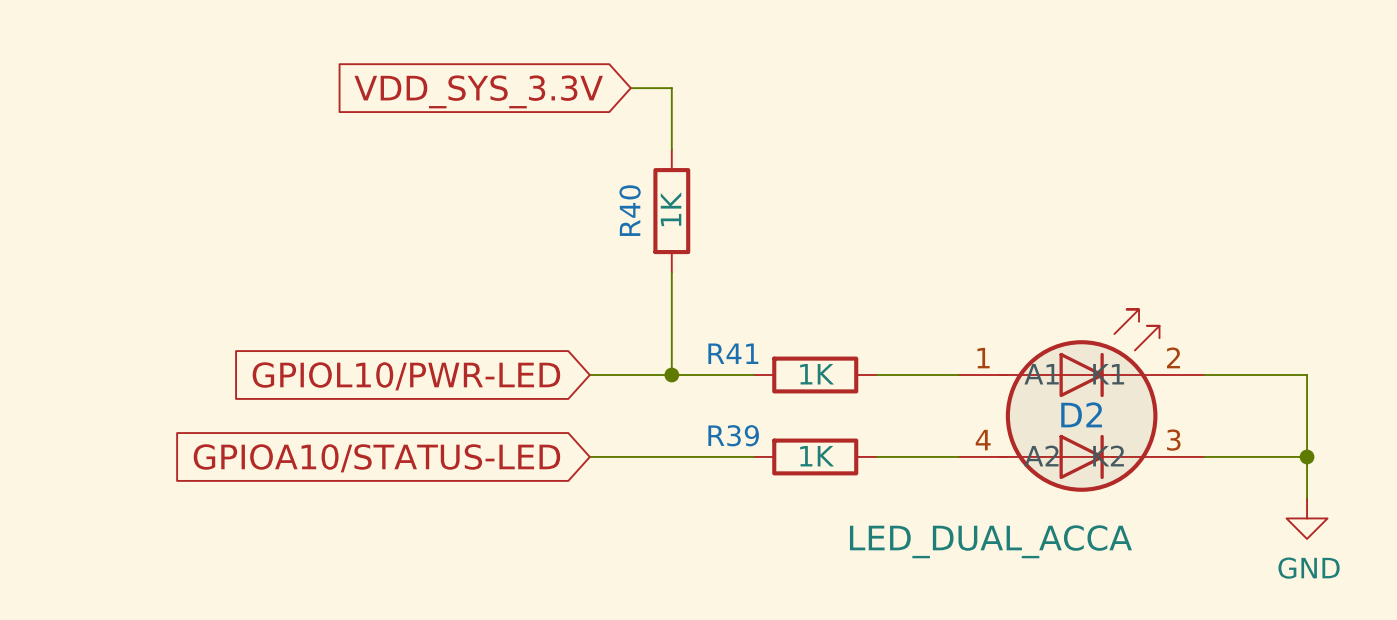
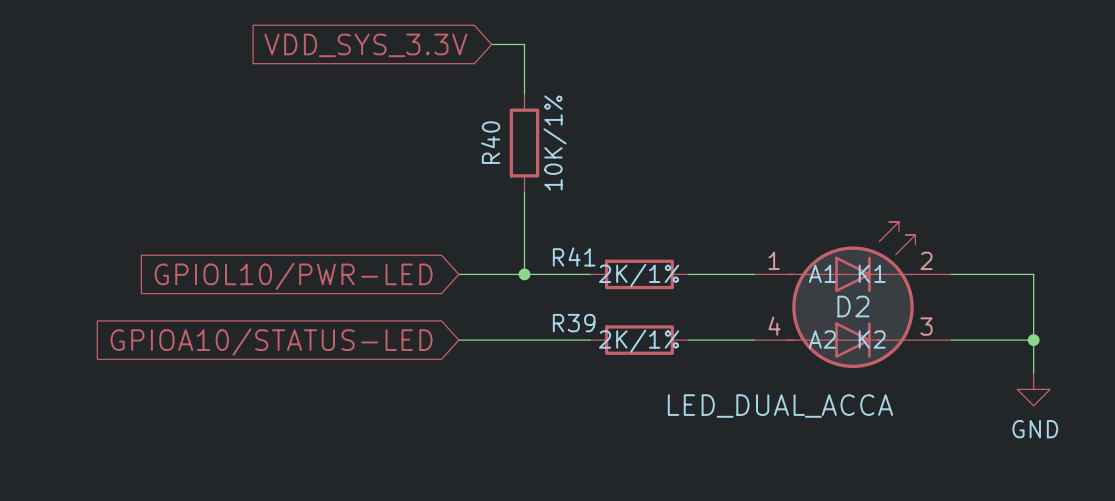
R40 value: 1K (671, 209) -> 10K/1% (555, 143)
R41 value: 1K (817, 374) -> 2K/1% (639, 275)
R39 value: 1K (817, 456) -> 2K/1% (639, 341)

